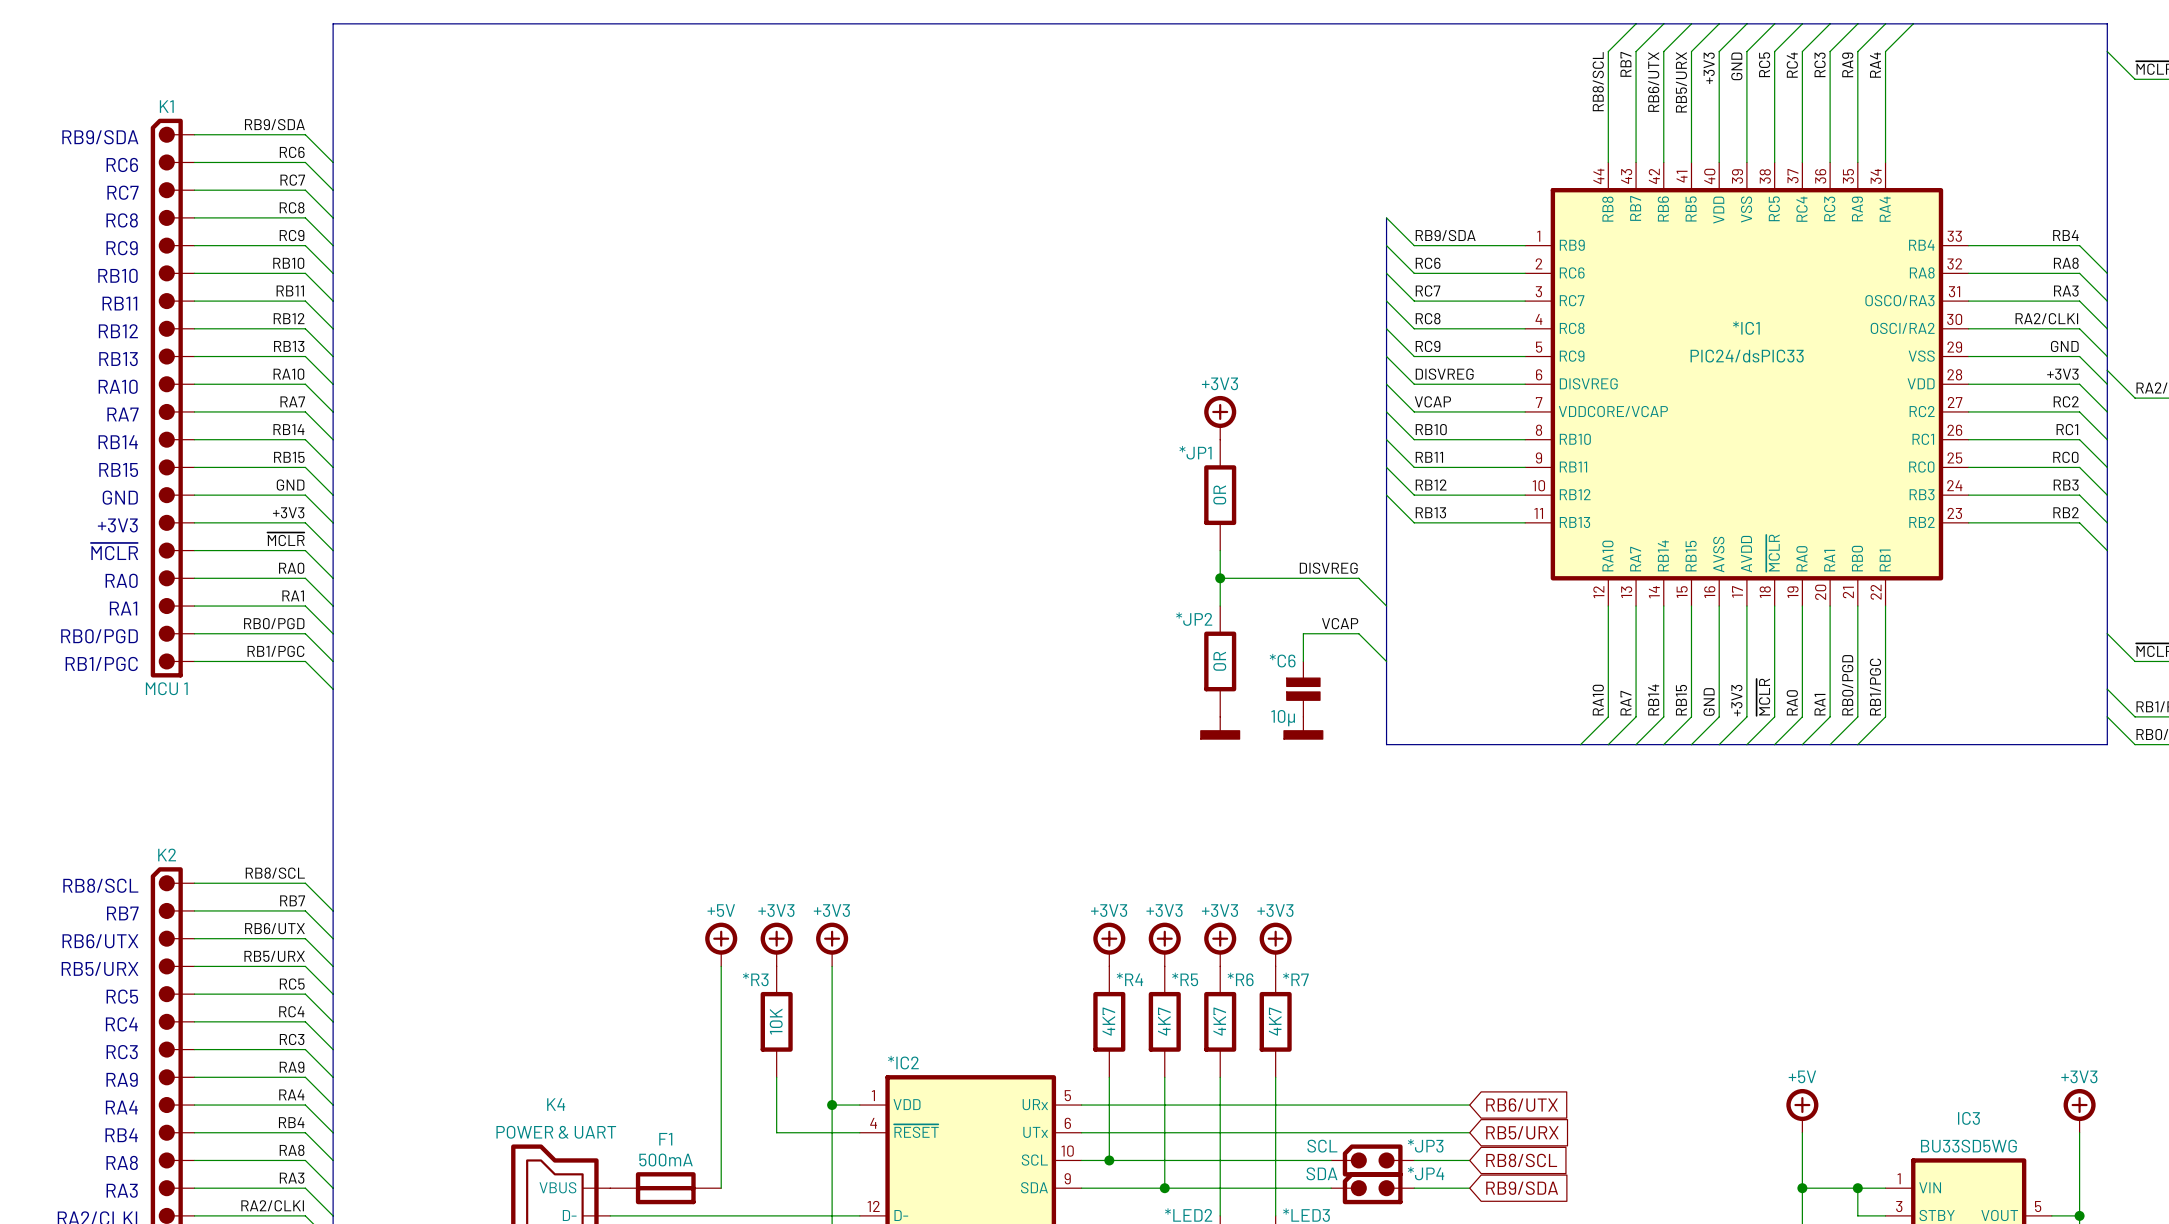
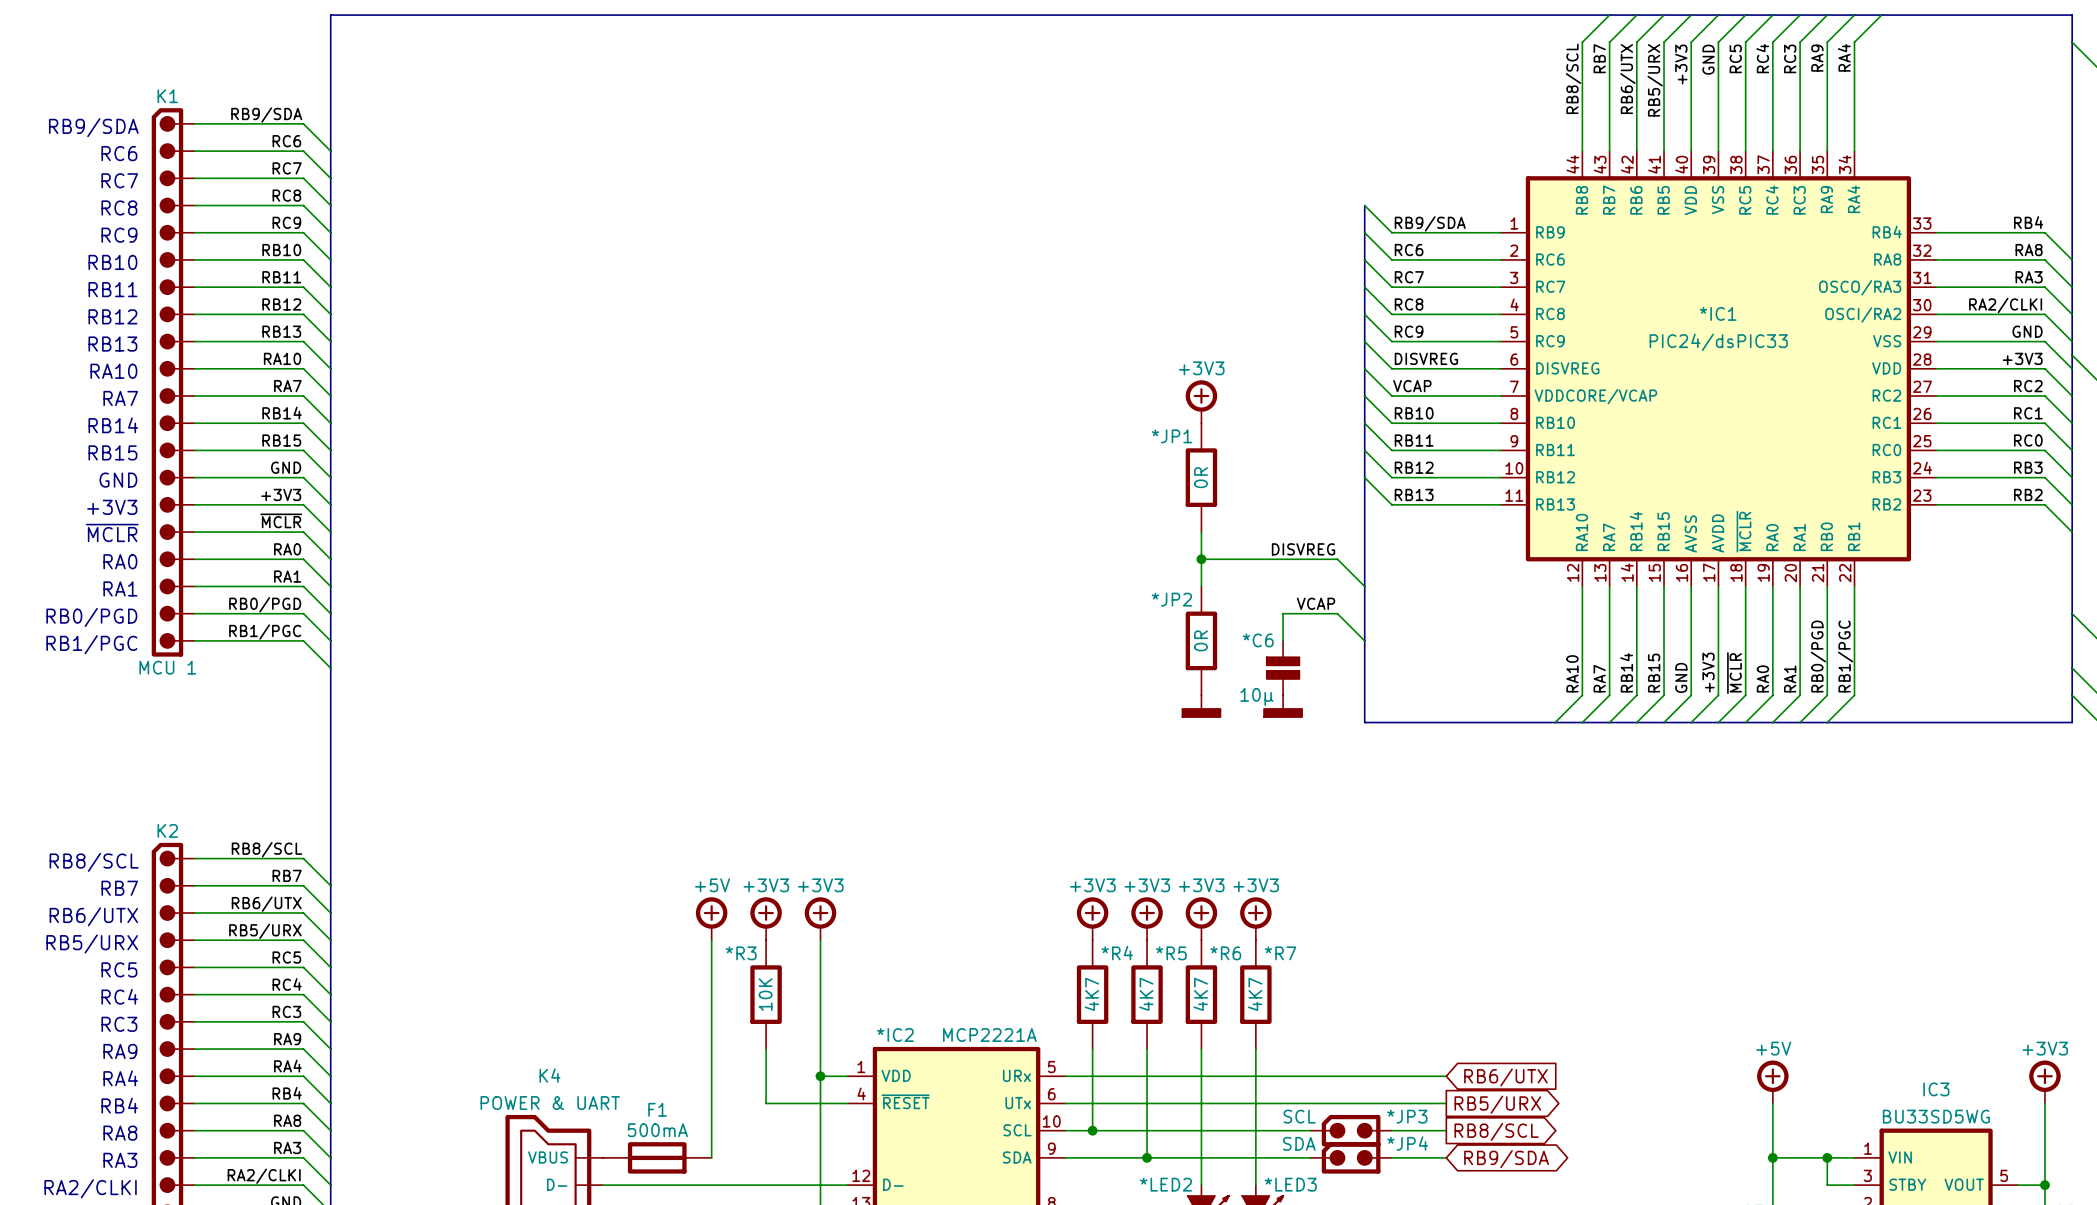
*IC2 value: none -> MCP2221A (989, 1034)
global label shape: input (1522, 1132) -> output (1497, 1104)
global label shape: input (1521, 1160) -> output (1496, 1131)
global label shape: input (1522, 1188) -> bidirectional (1506, 1159)

